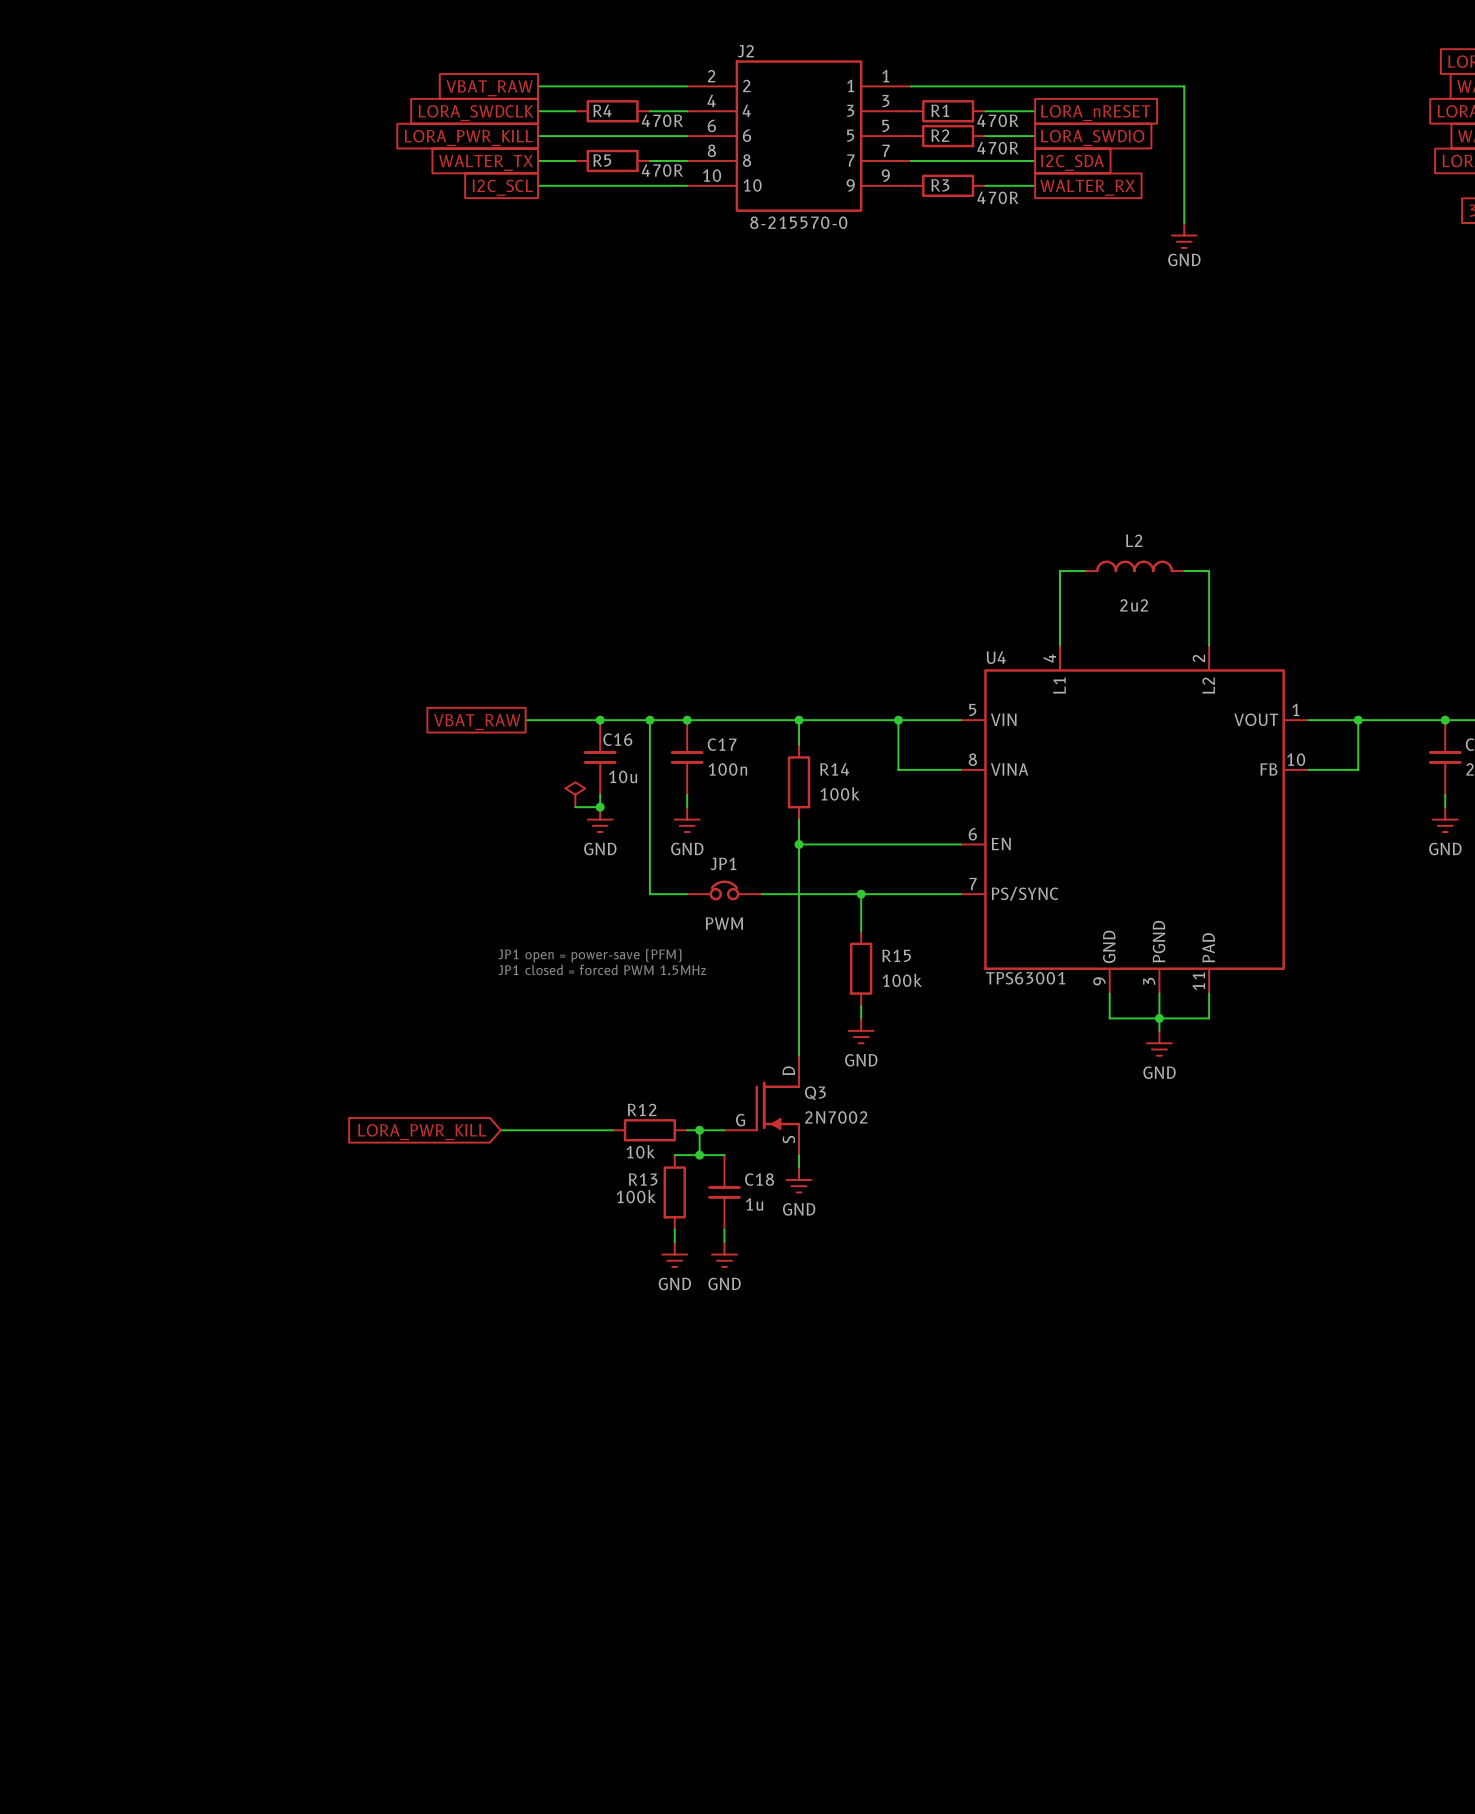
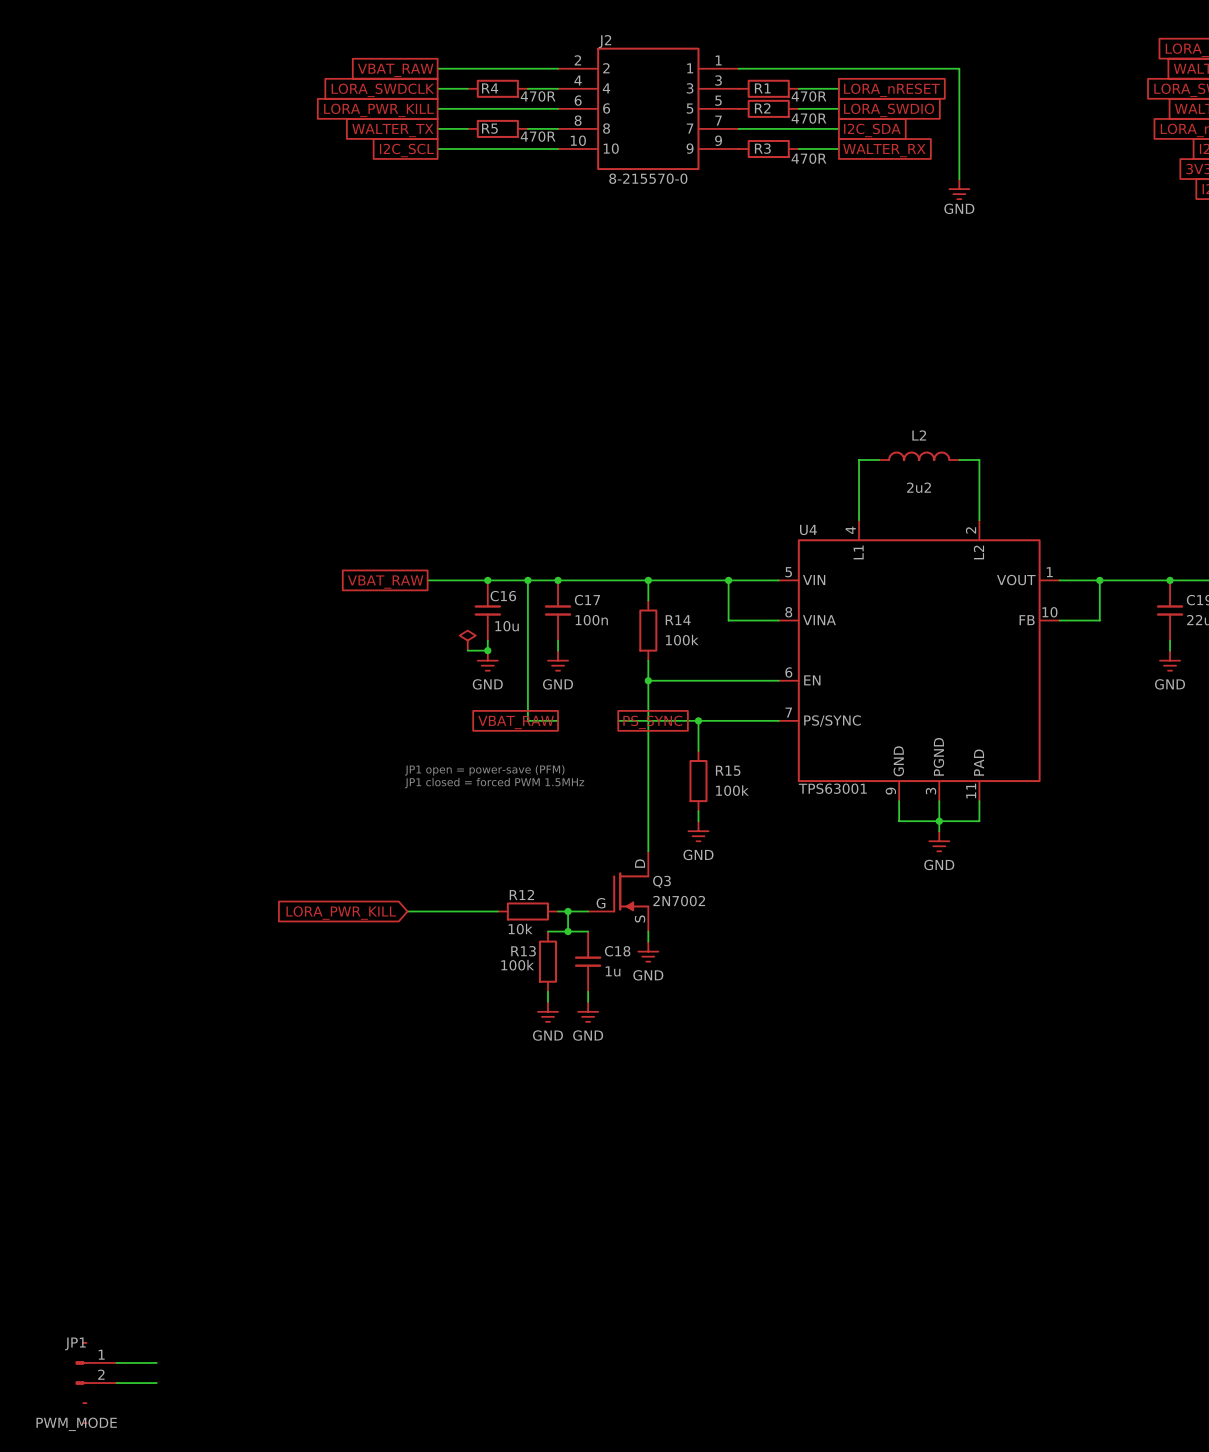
JP1 name position: JP1 (723, 863) -> JP1 (75, 1343)
JP1 symbol: [687, 880, 762, 901] -> [75, 1342, 117, 1424]
global label: none -> VBAT_RAW (516, 722)
global label: none -> PS_SYNC (652, 722)
JP1 value: PWM (724, 923) -> PWM_MODE (76, 1424)
wire: none -> (116, 1362) (156, 1362)
wire: none -> (116, 1383) (156, 1383)

